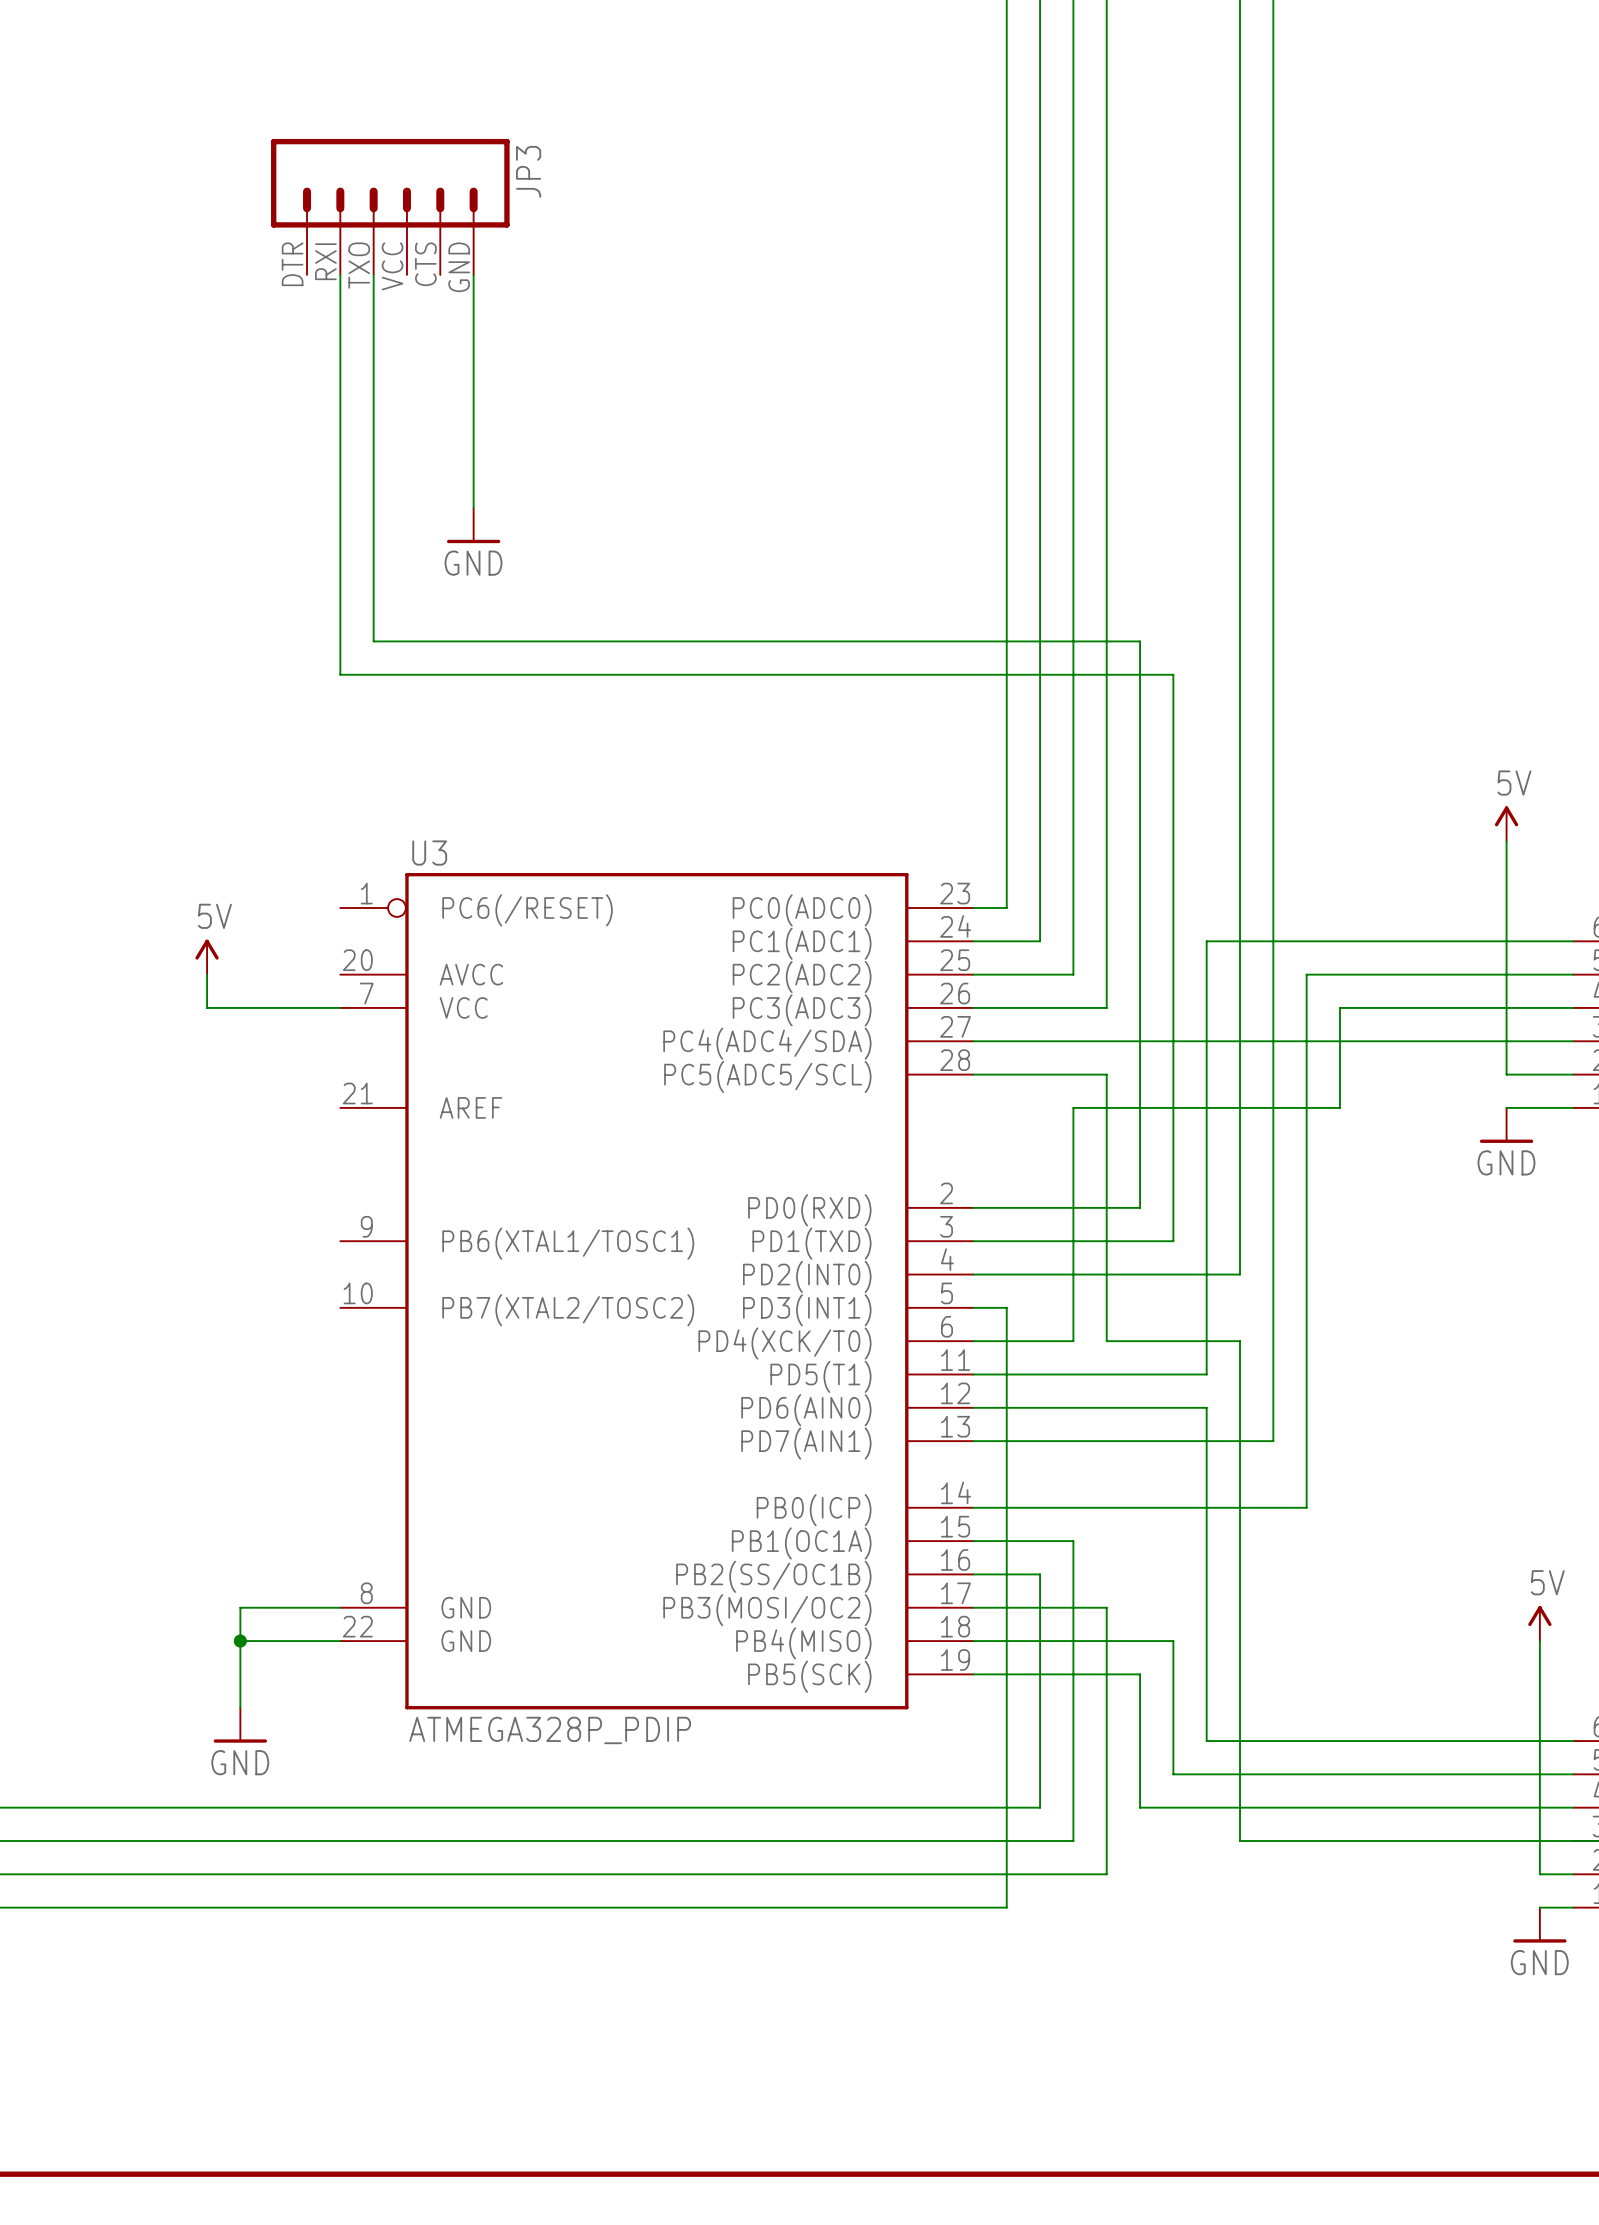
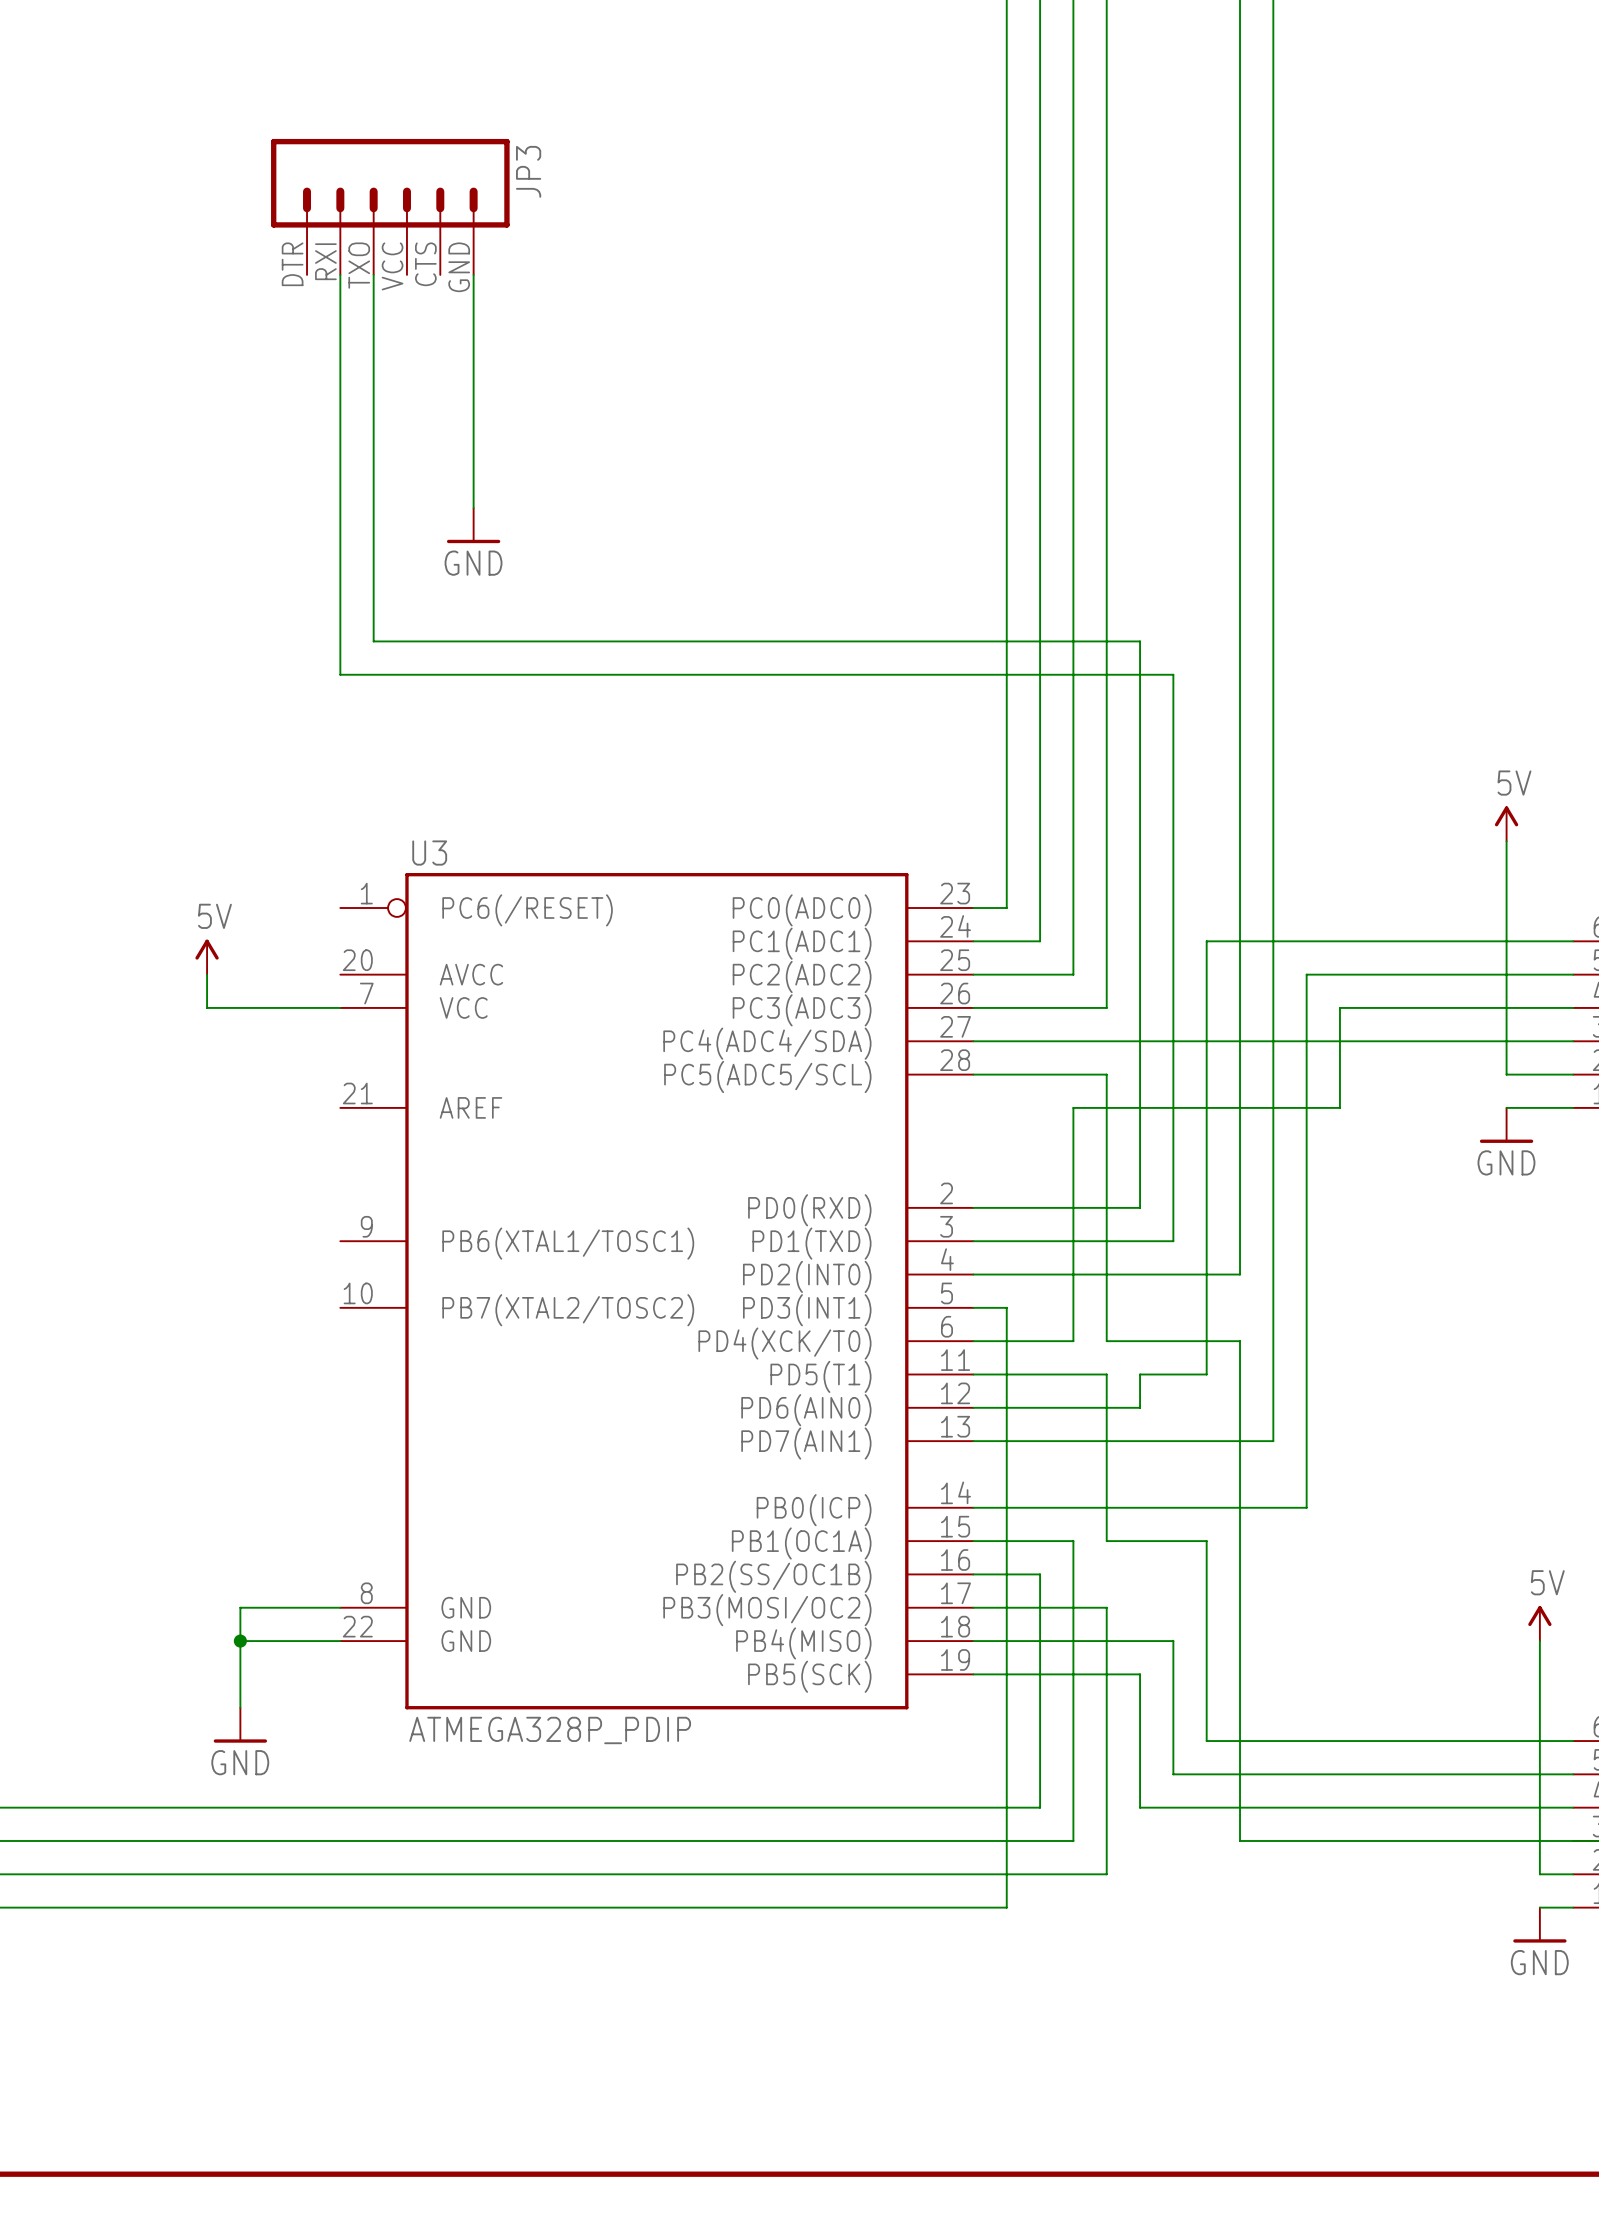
wire: (1106, 1374) (1140, 1374) -> (1140, 1407) (1140, 1374)
wire: (1140, 1407) (1206, 1407) (1206, 1541) -> (1106, 1374) (1106, 1541) (1206, 1541)

